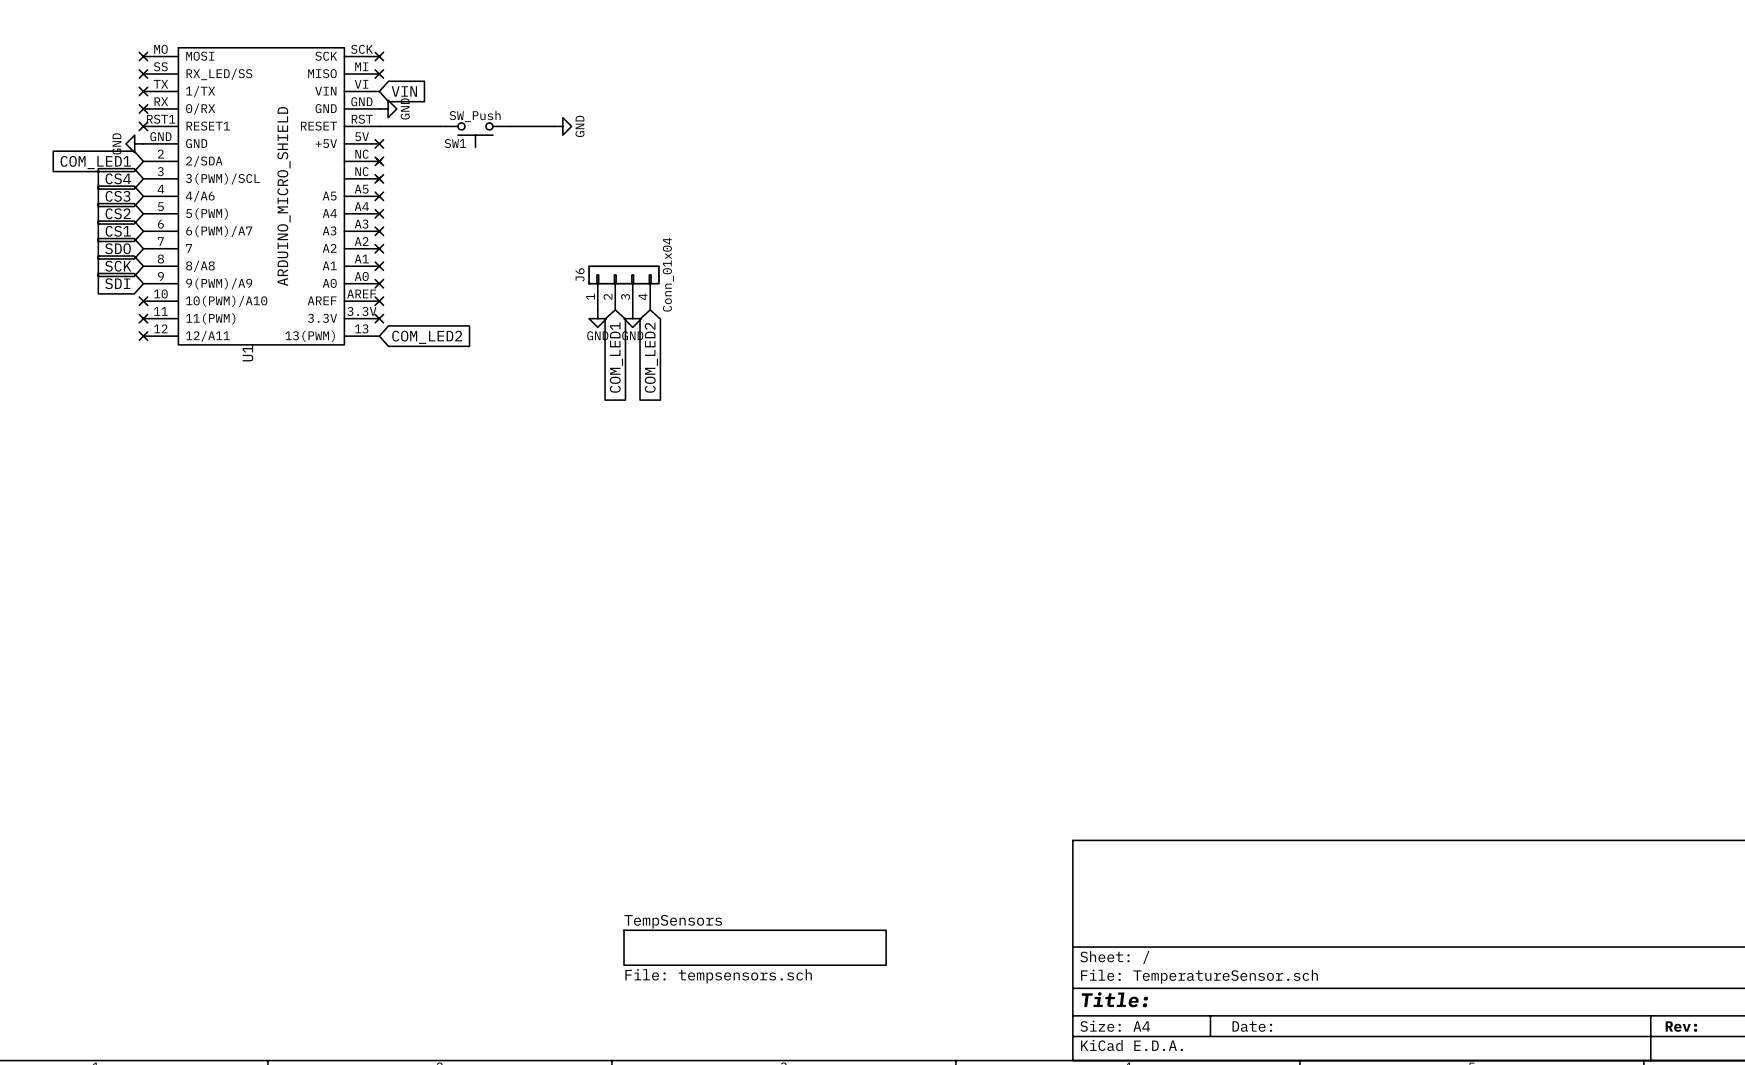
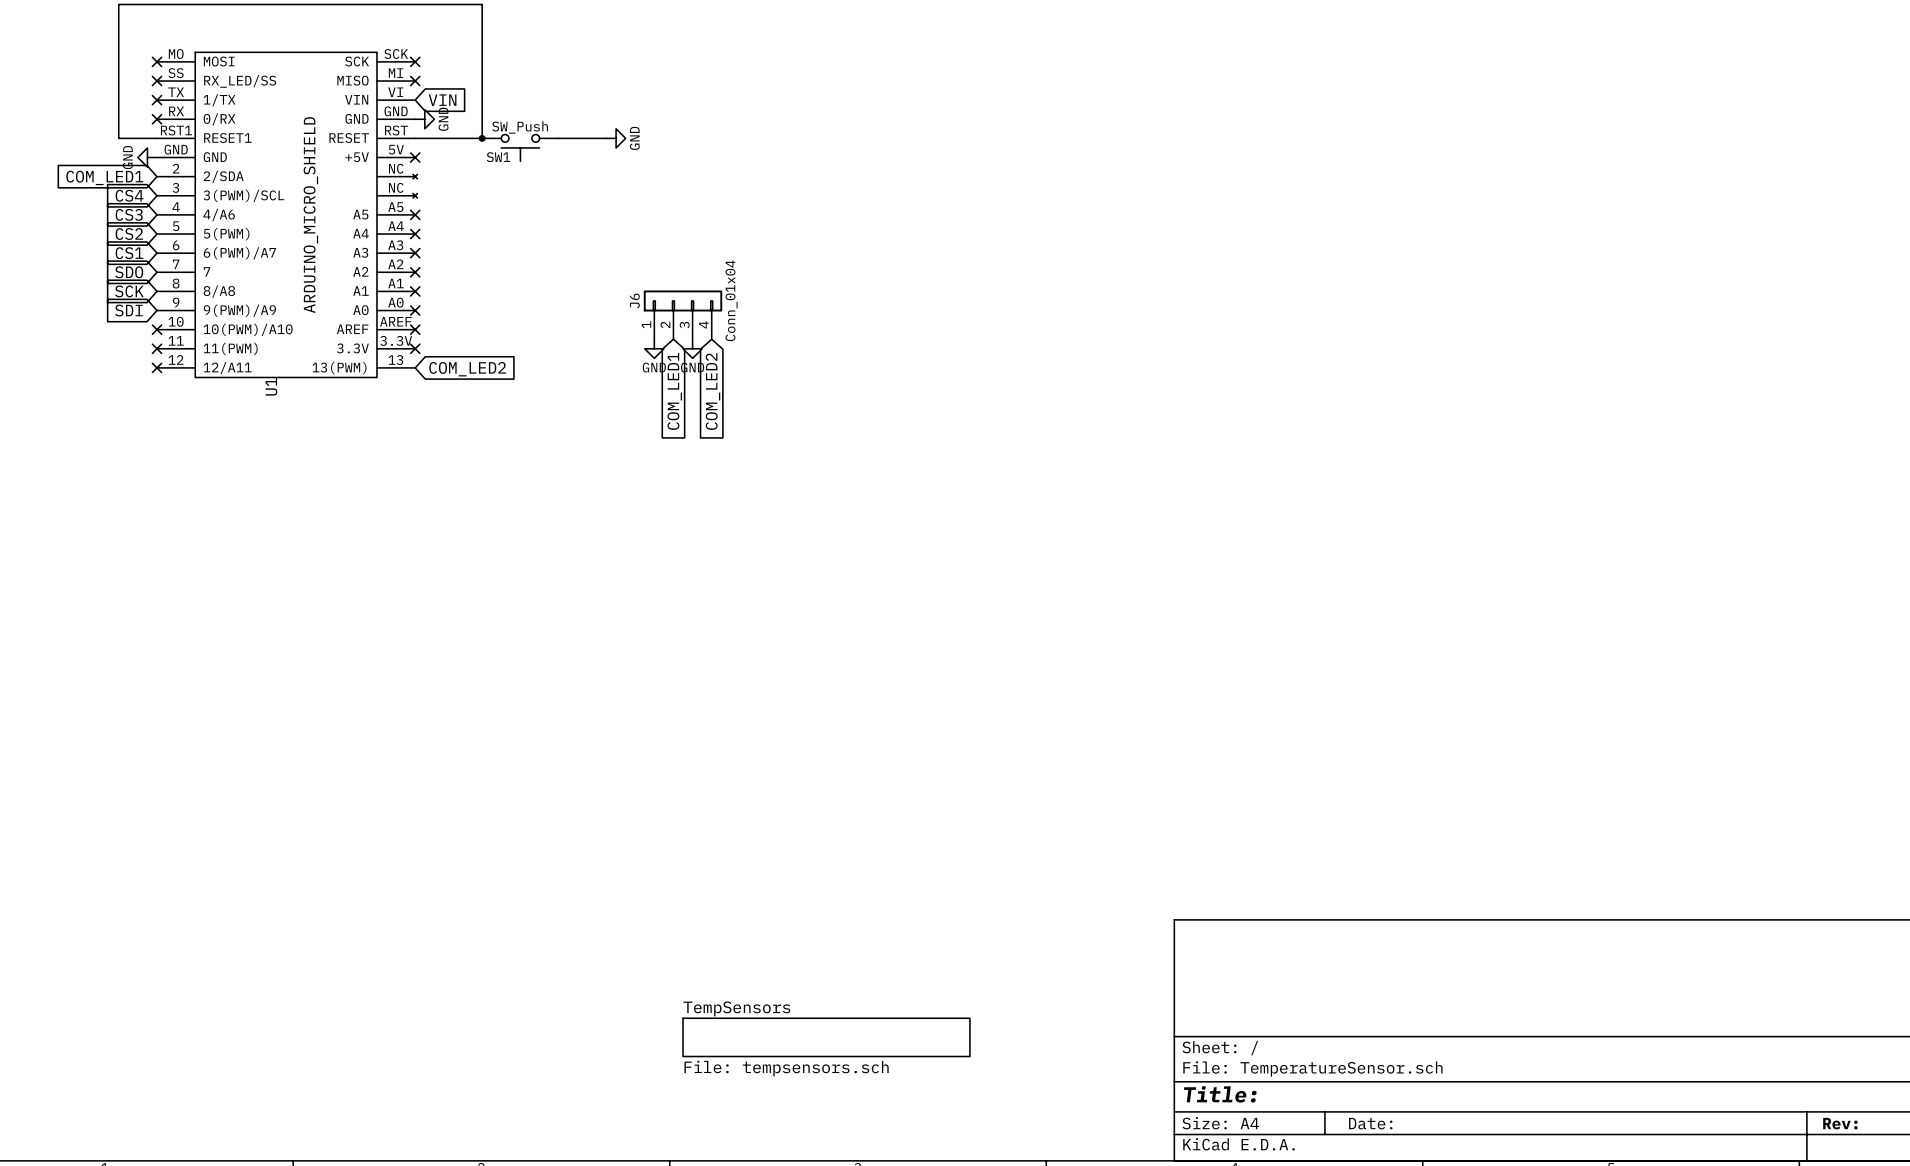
wire: none -> (157, 138) (118, 138) (118, 4) (482, 4) (482, 138)
no-connect mark: (143, 126) -> none
junction: none -> (482, 138)
no-connect mark: (379, 161) -> none
no-connect mark: (379, 178) -> none

